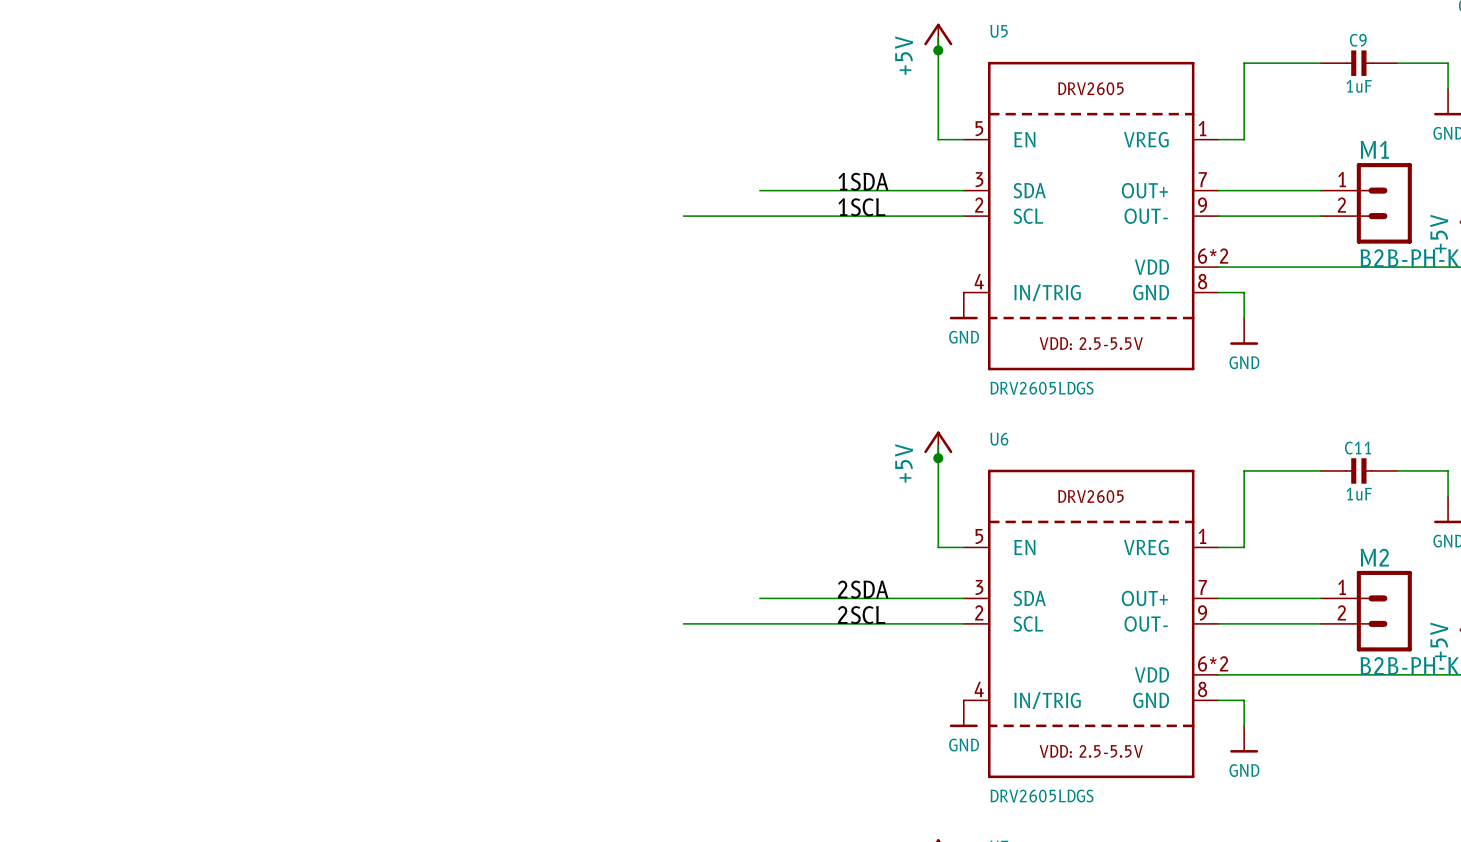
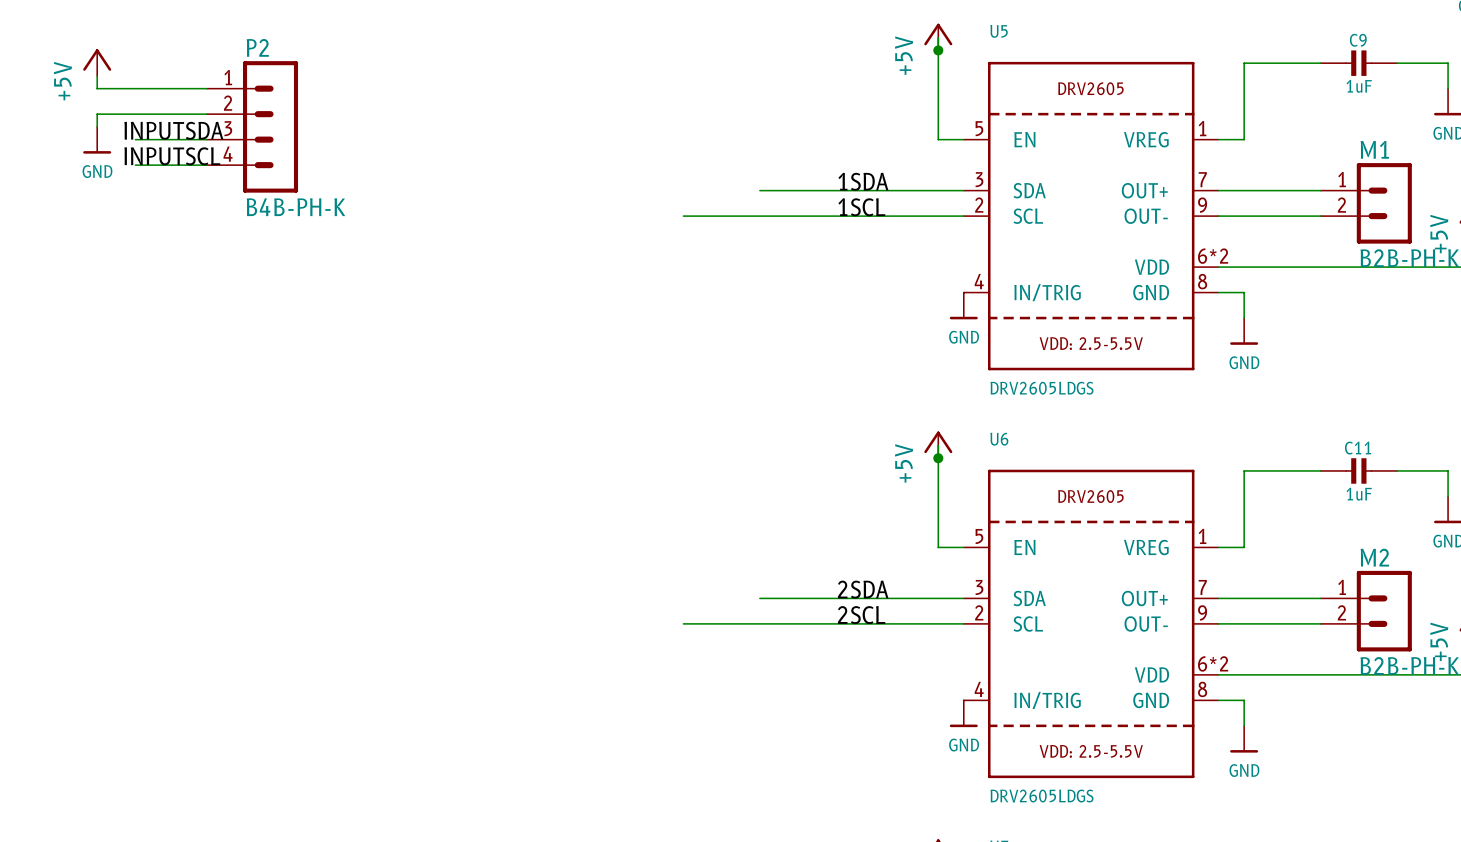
power symbol: none -> +5V (97, 62)
wire: none -> (97, 75) (97, 88) (206, 88)
wire: none -> (206, 114) (97, 114) (97, 126)
P2: none -> B4B-PH-K (252, 126)
label: none -> INPUTSDA (173, 130)
wire: none -> (135, 139) (206, 139)
power symbol: none -> GND (97, 140)
label: none -> INPUTSCL (172, 156)
wire: none -> (135, 165) (206, 165)

